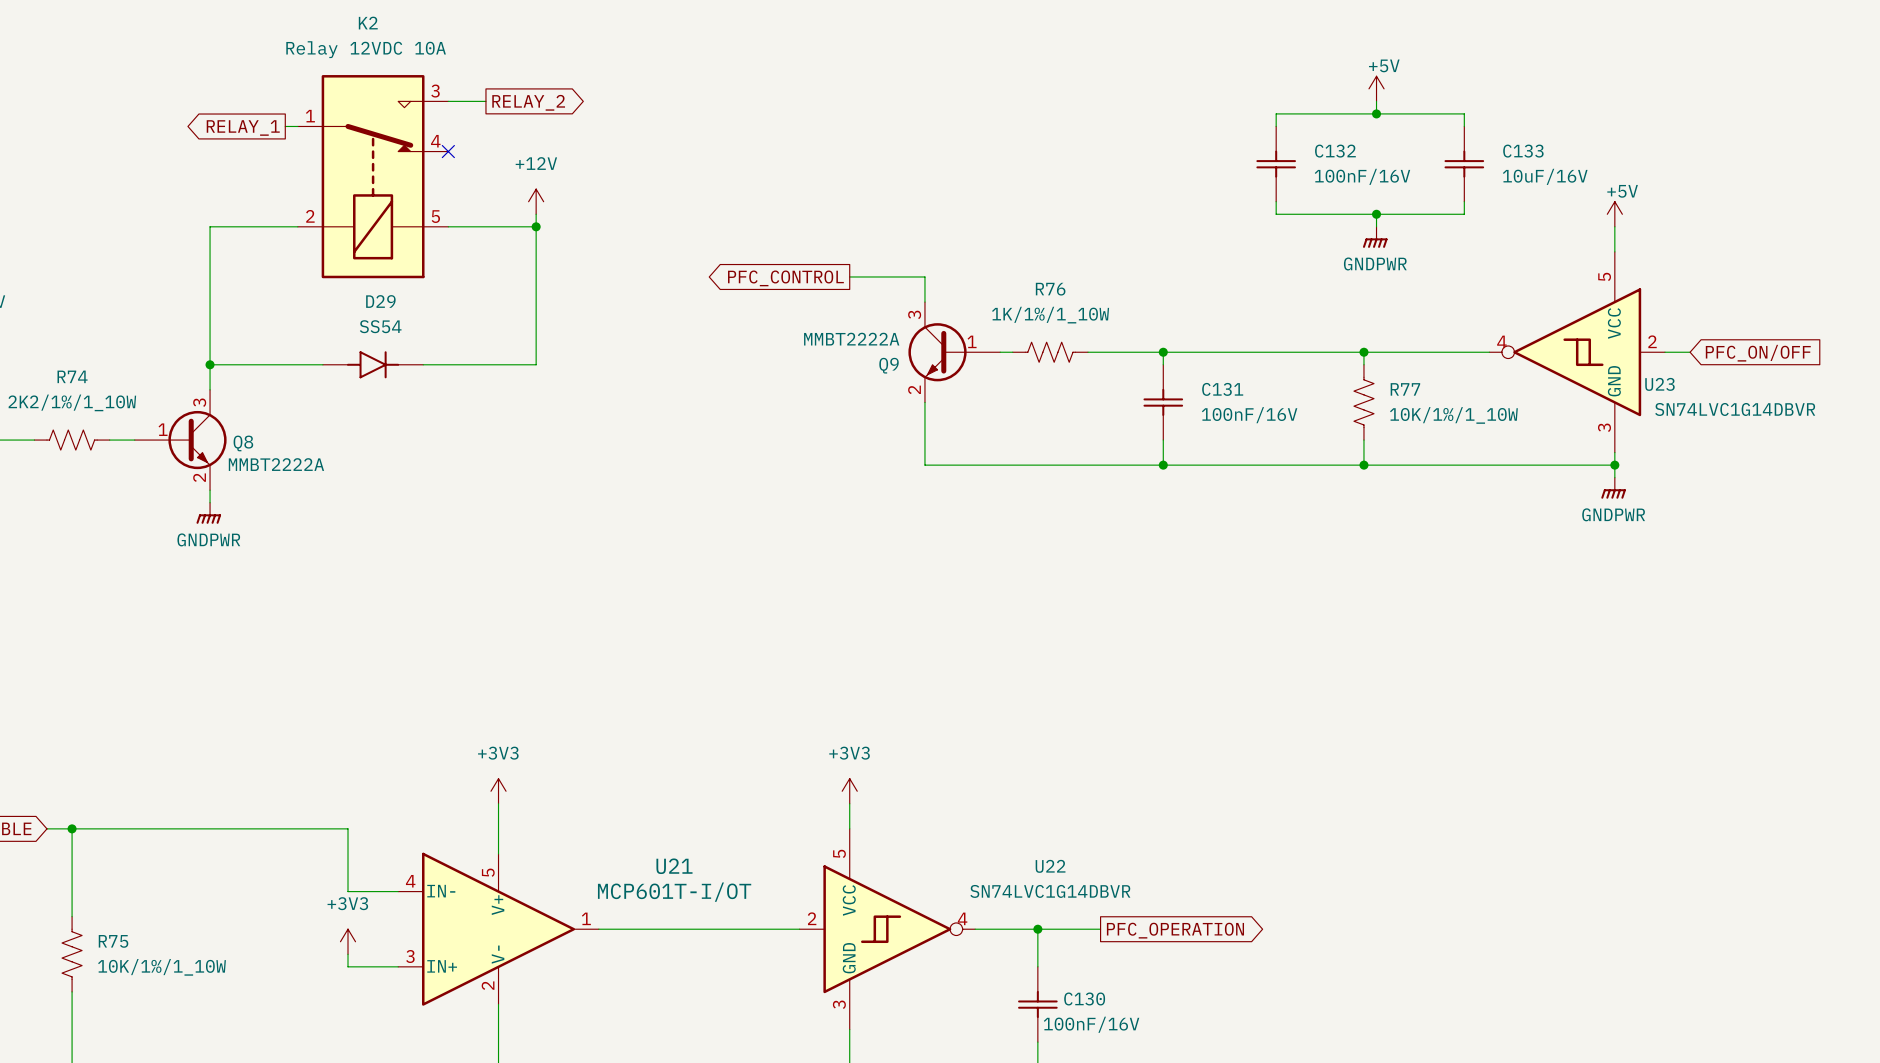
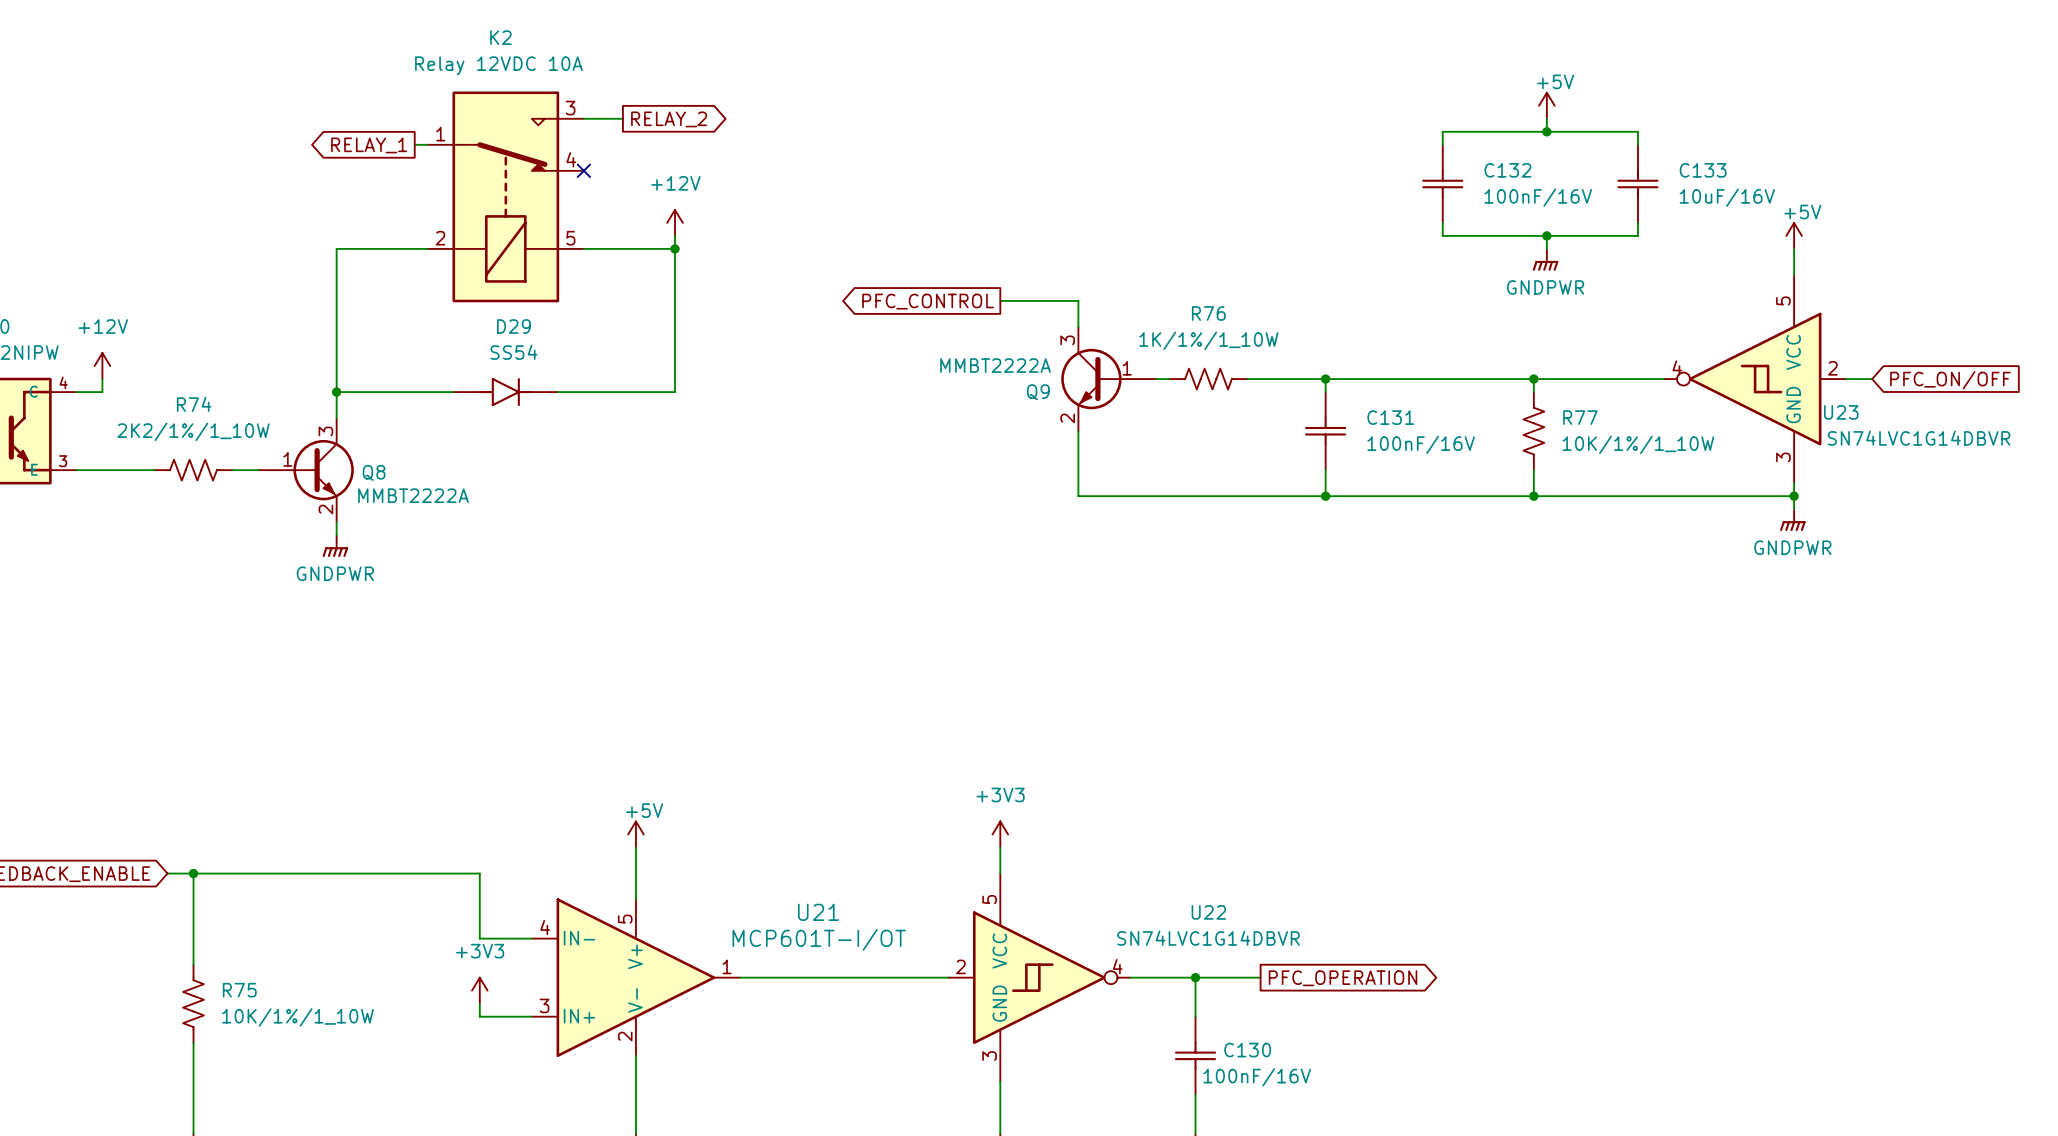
power symbol: +3V3 (498, 791) -> +5V (635, 834)

